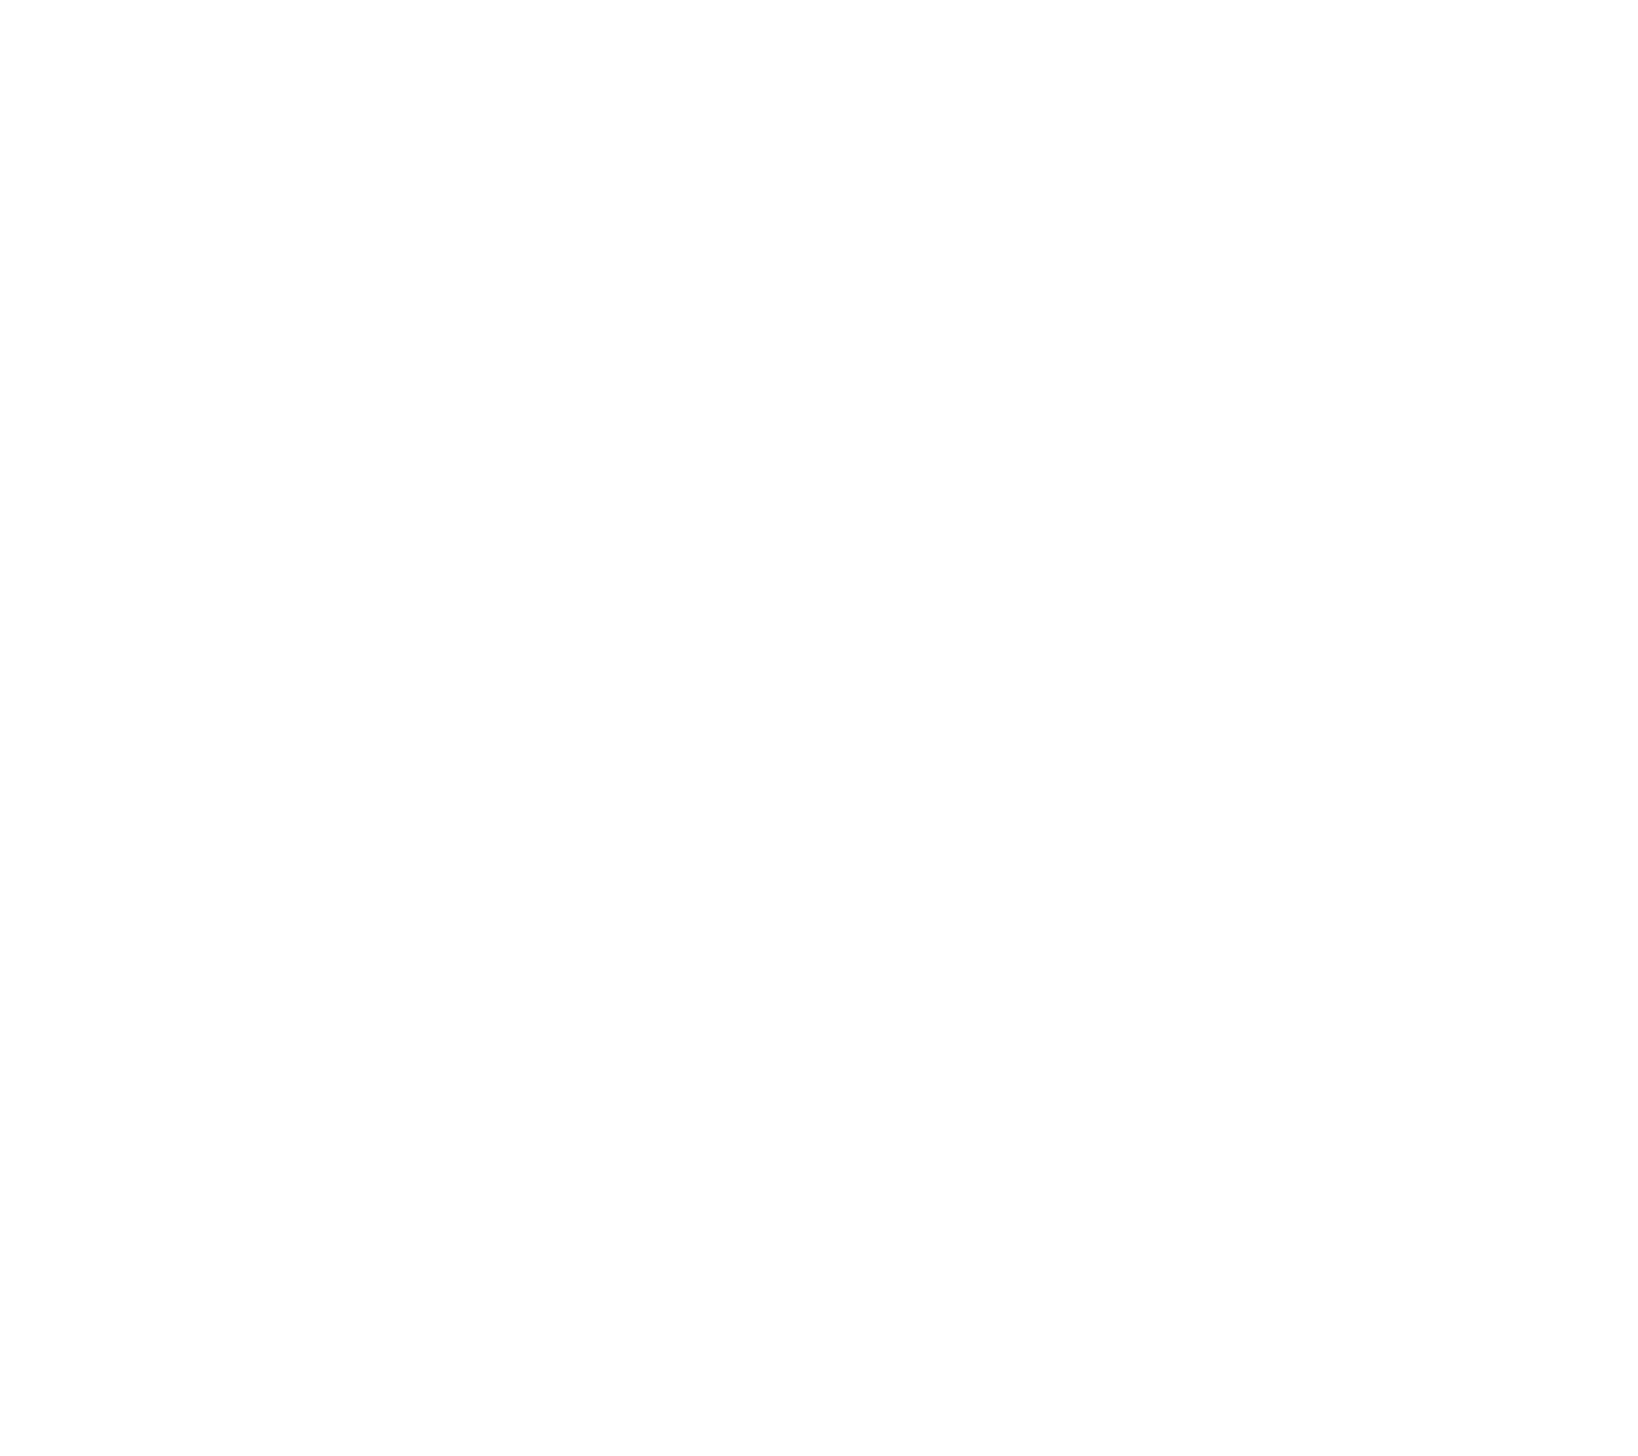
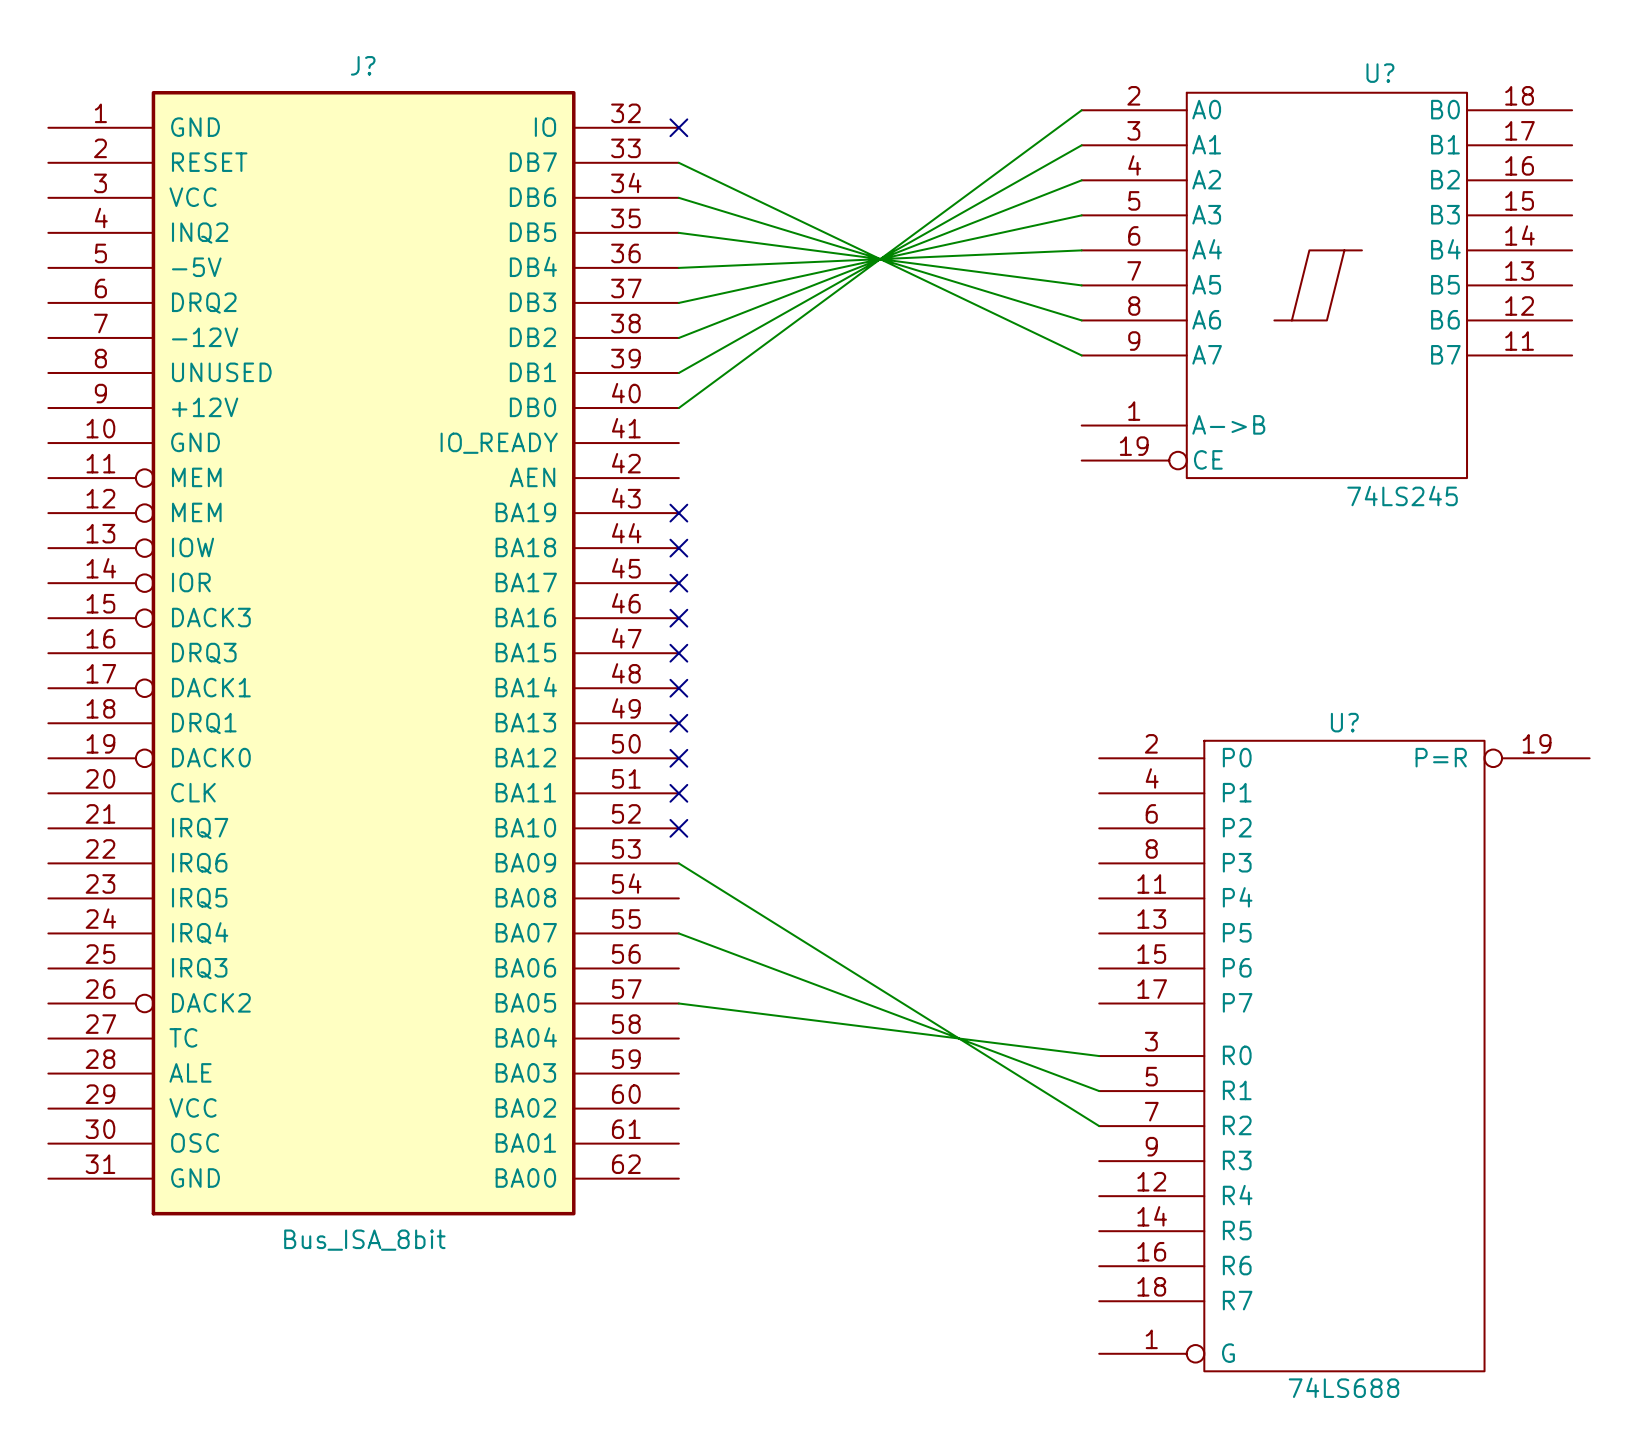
wire: none -> (1081, 110) (678, 408)
no-connect mark: none -> (678, 127)
wire: none -> (1081, 145) (678, 372)
wire: none -> (678, 162) (1081, 355)
wire: none -> (1081, 180) (678, 337)
wire: none -> (678, 197) (1081, 320)
wire: none -> (1081, 215) (678, 302)
wire: none -> (678, 232) (1081, 285)
wire: none -> (1081, 250) (678, 267)
U?: none -> 74LS245 (1326, 285)
no-connect mark: none -> (678, 513)
no-connect mark: none -> (678, 548)
no-connect mark: none -> (678, 583)
no-connect mark: none -> (678, 618)
J?: none -> Bus_ISA_8bit (363, 653)
no-connect mark: none -> (678, 653)
no-connect mark: none -> (678, 688)
no-connect mark: none -> (678, 723)
no-connect mark: none -> (678, 758)
no-connect mark: none -> (678, 793)
no-connect mark: none -> (678, 828)
wire: none -> (678, 863) (1099, 1126)
wire: none -> (678, 933) (1099, 1091)
wire: none -> (678, 1003) (1099, 1056)
U?: none -> 74LS688 (1344, 1056)

